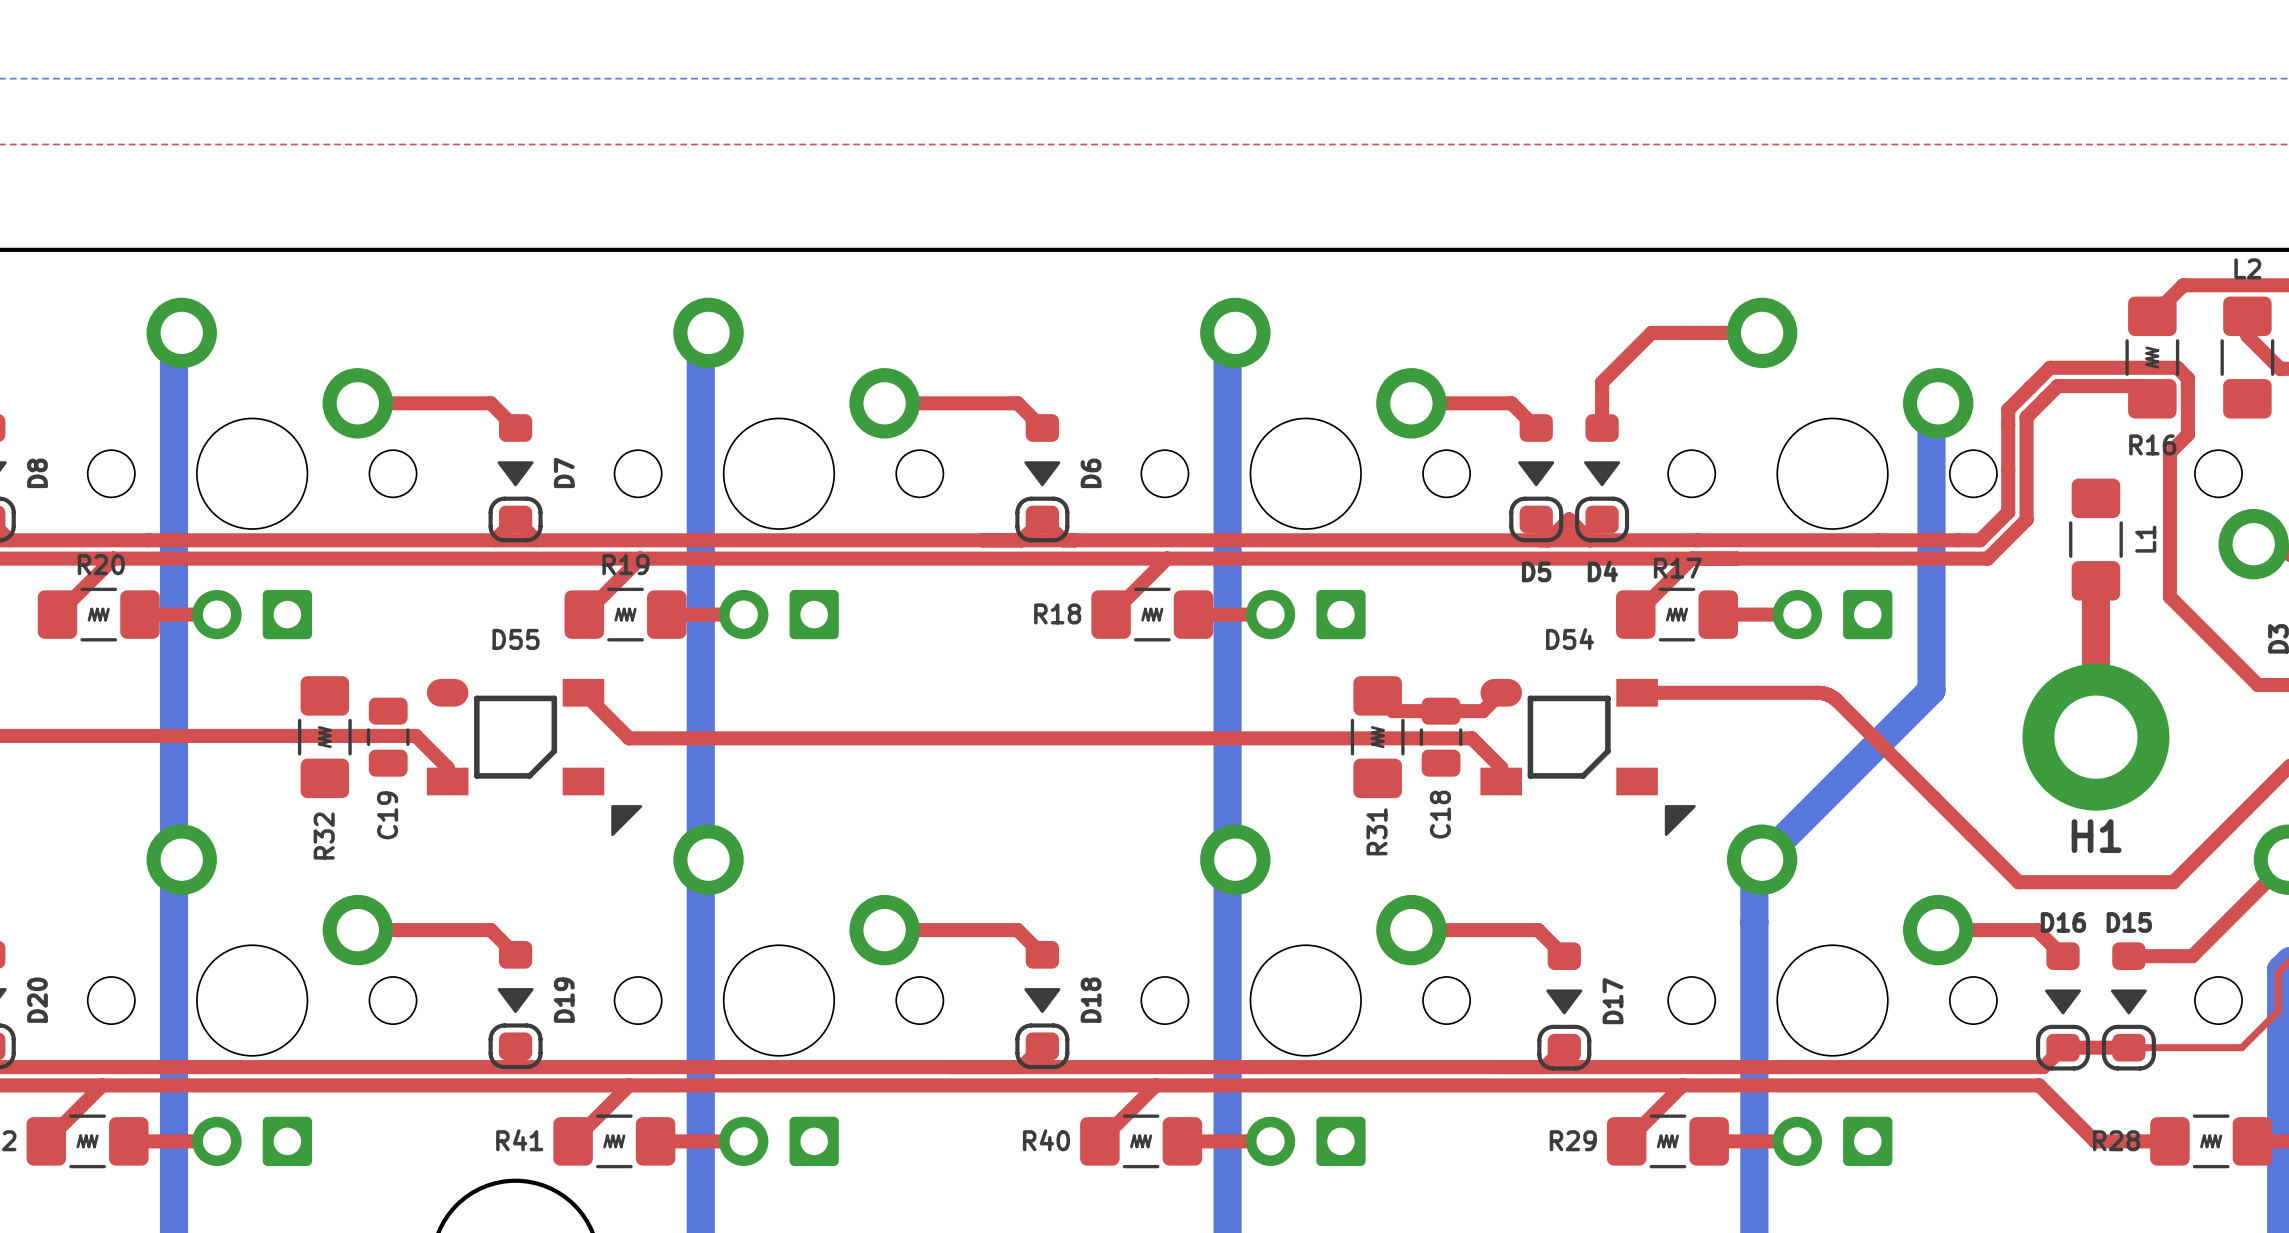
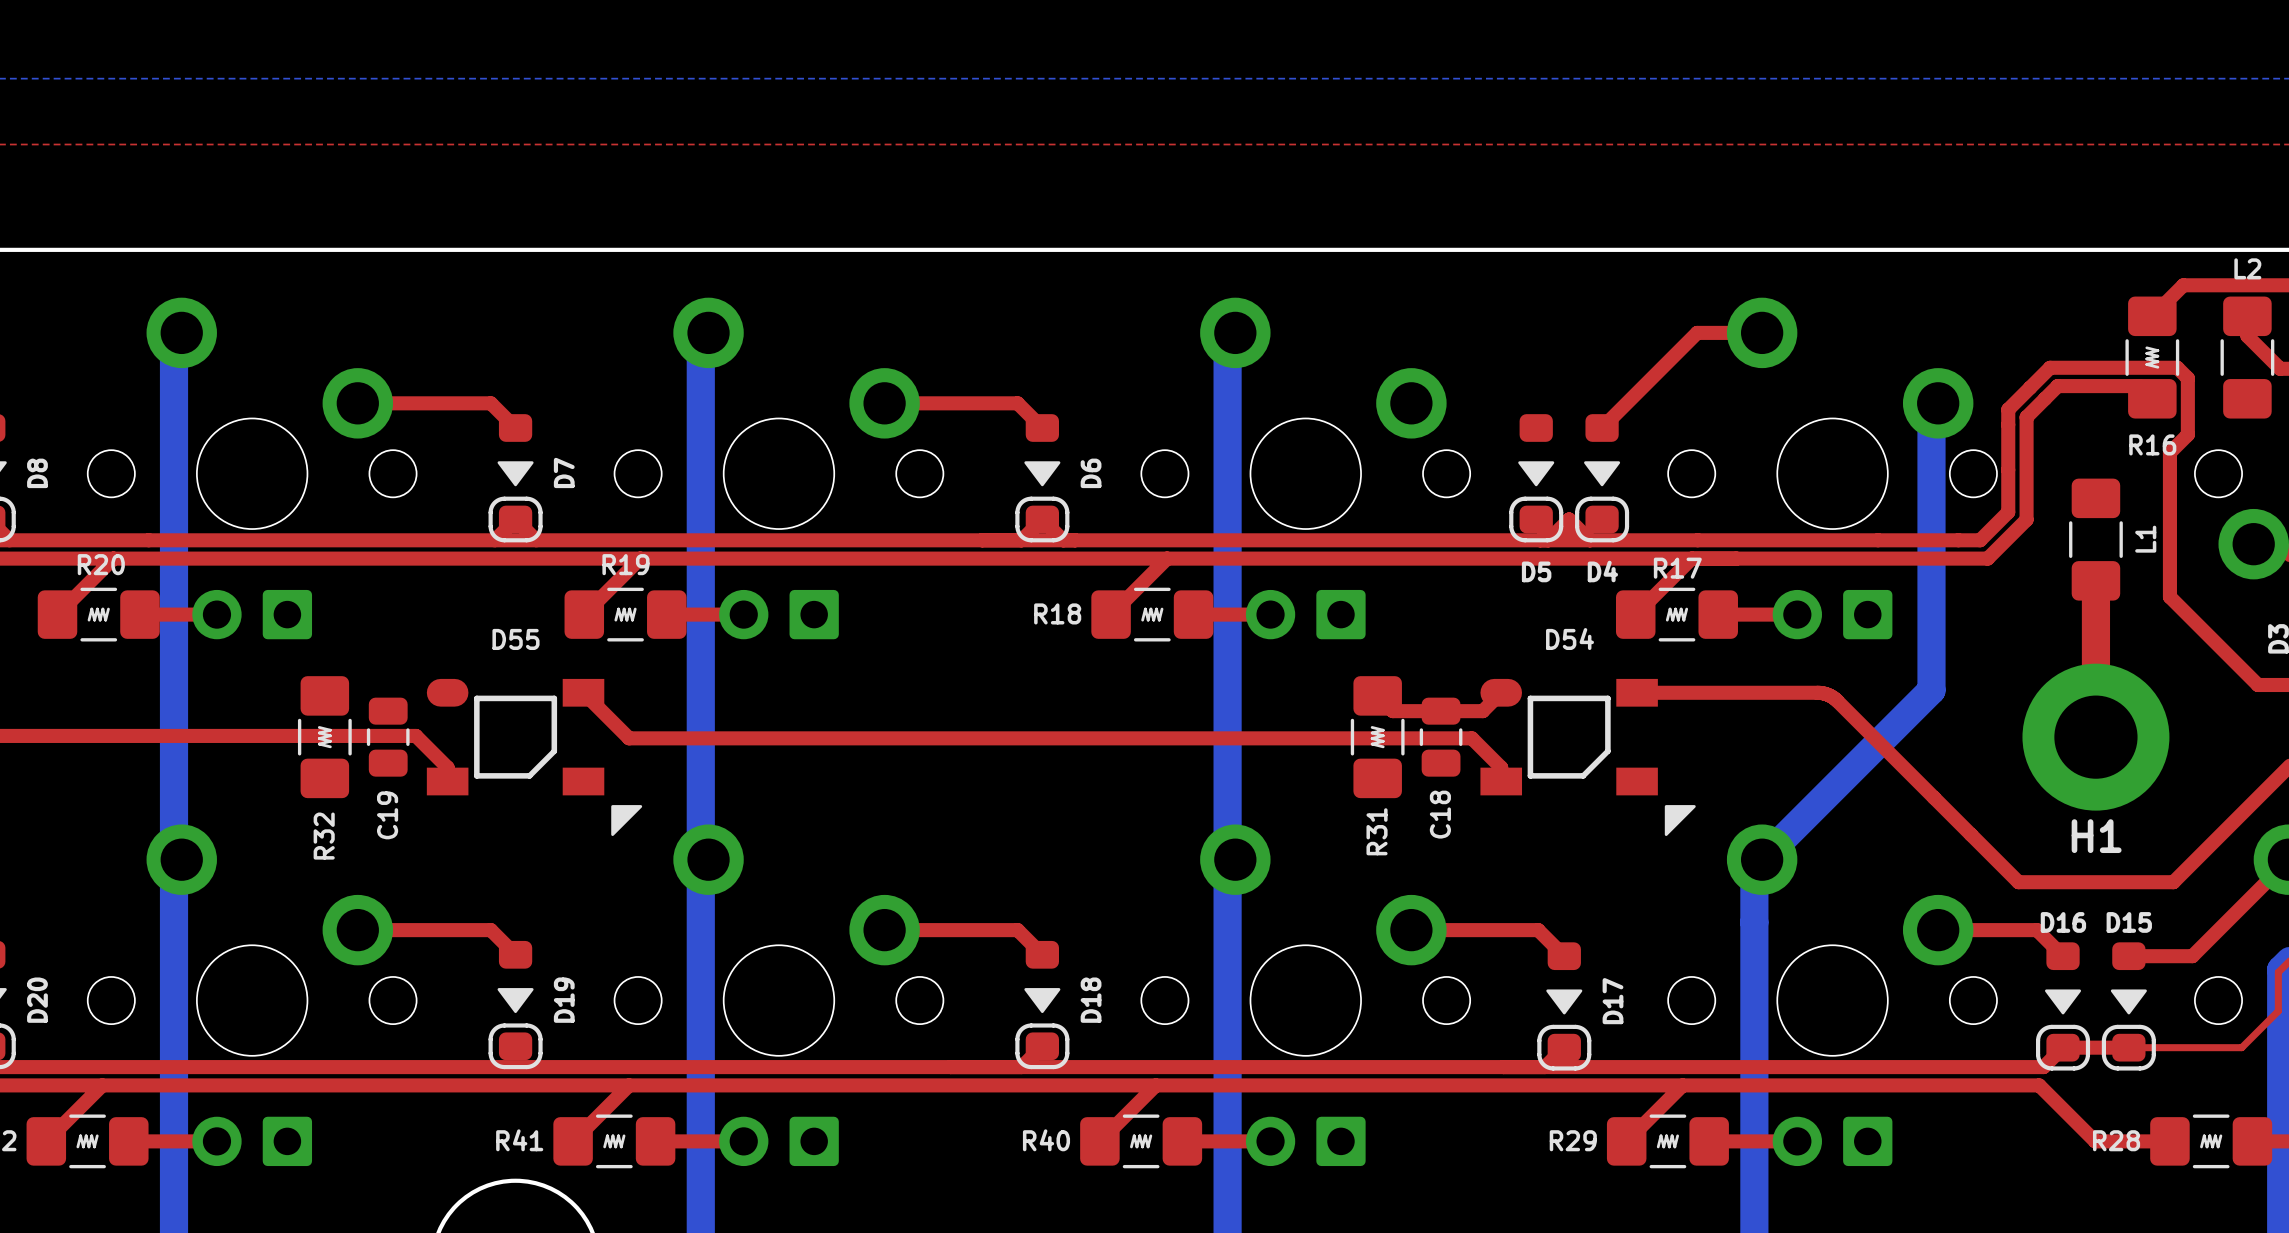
top track: (1697, 332) (1651, 332) (1602, 382) (1602, 428) -> (1697, 332) (1602, 428)
top track: (1411, 403) (1511, 403) (1536, 428) -> none

